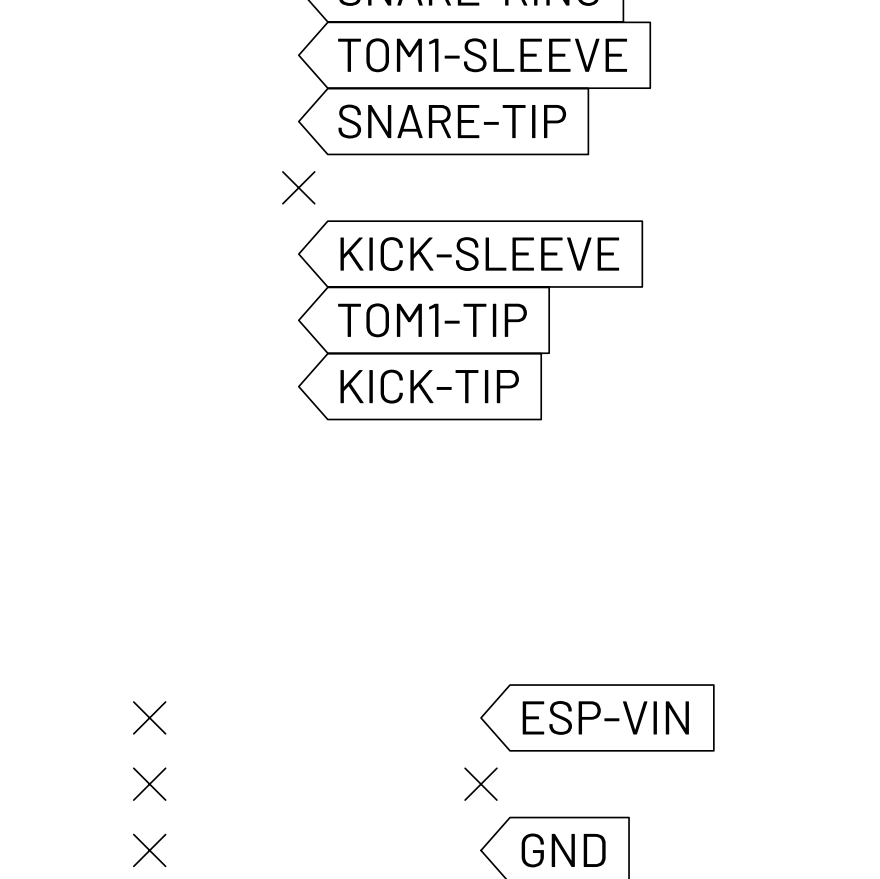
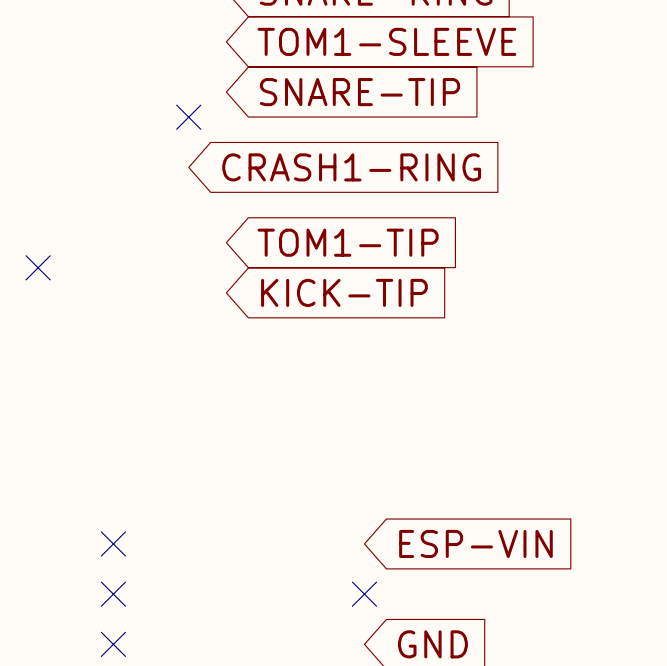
no-connect mark position: (298, 187) -> (188, 117)
global label: none -> CRASH1-RING (351, 167)
global label: KICK-SLEEVE (479, 254) -> none
no-connect mark: none -> (38, 267)

